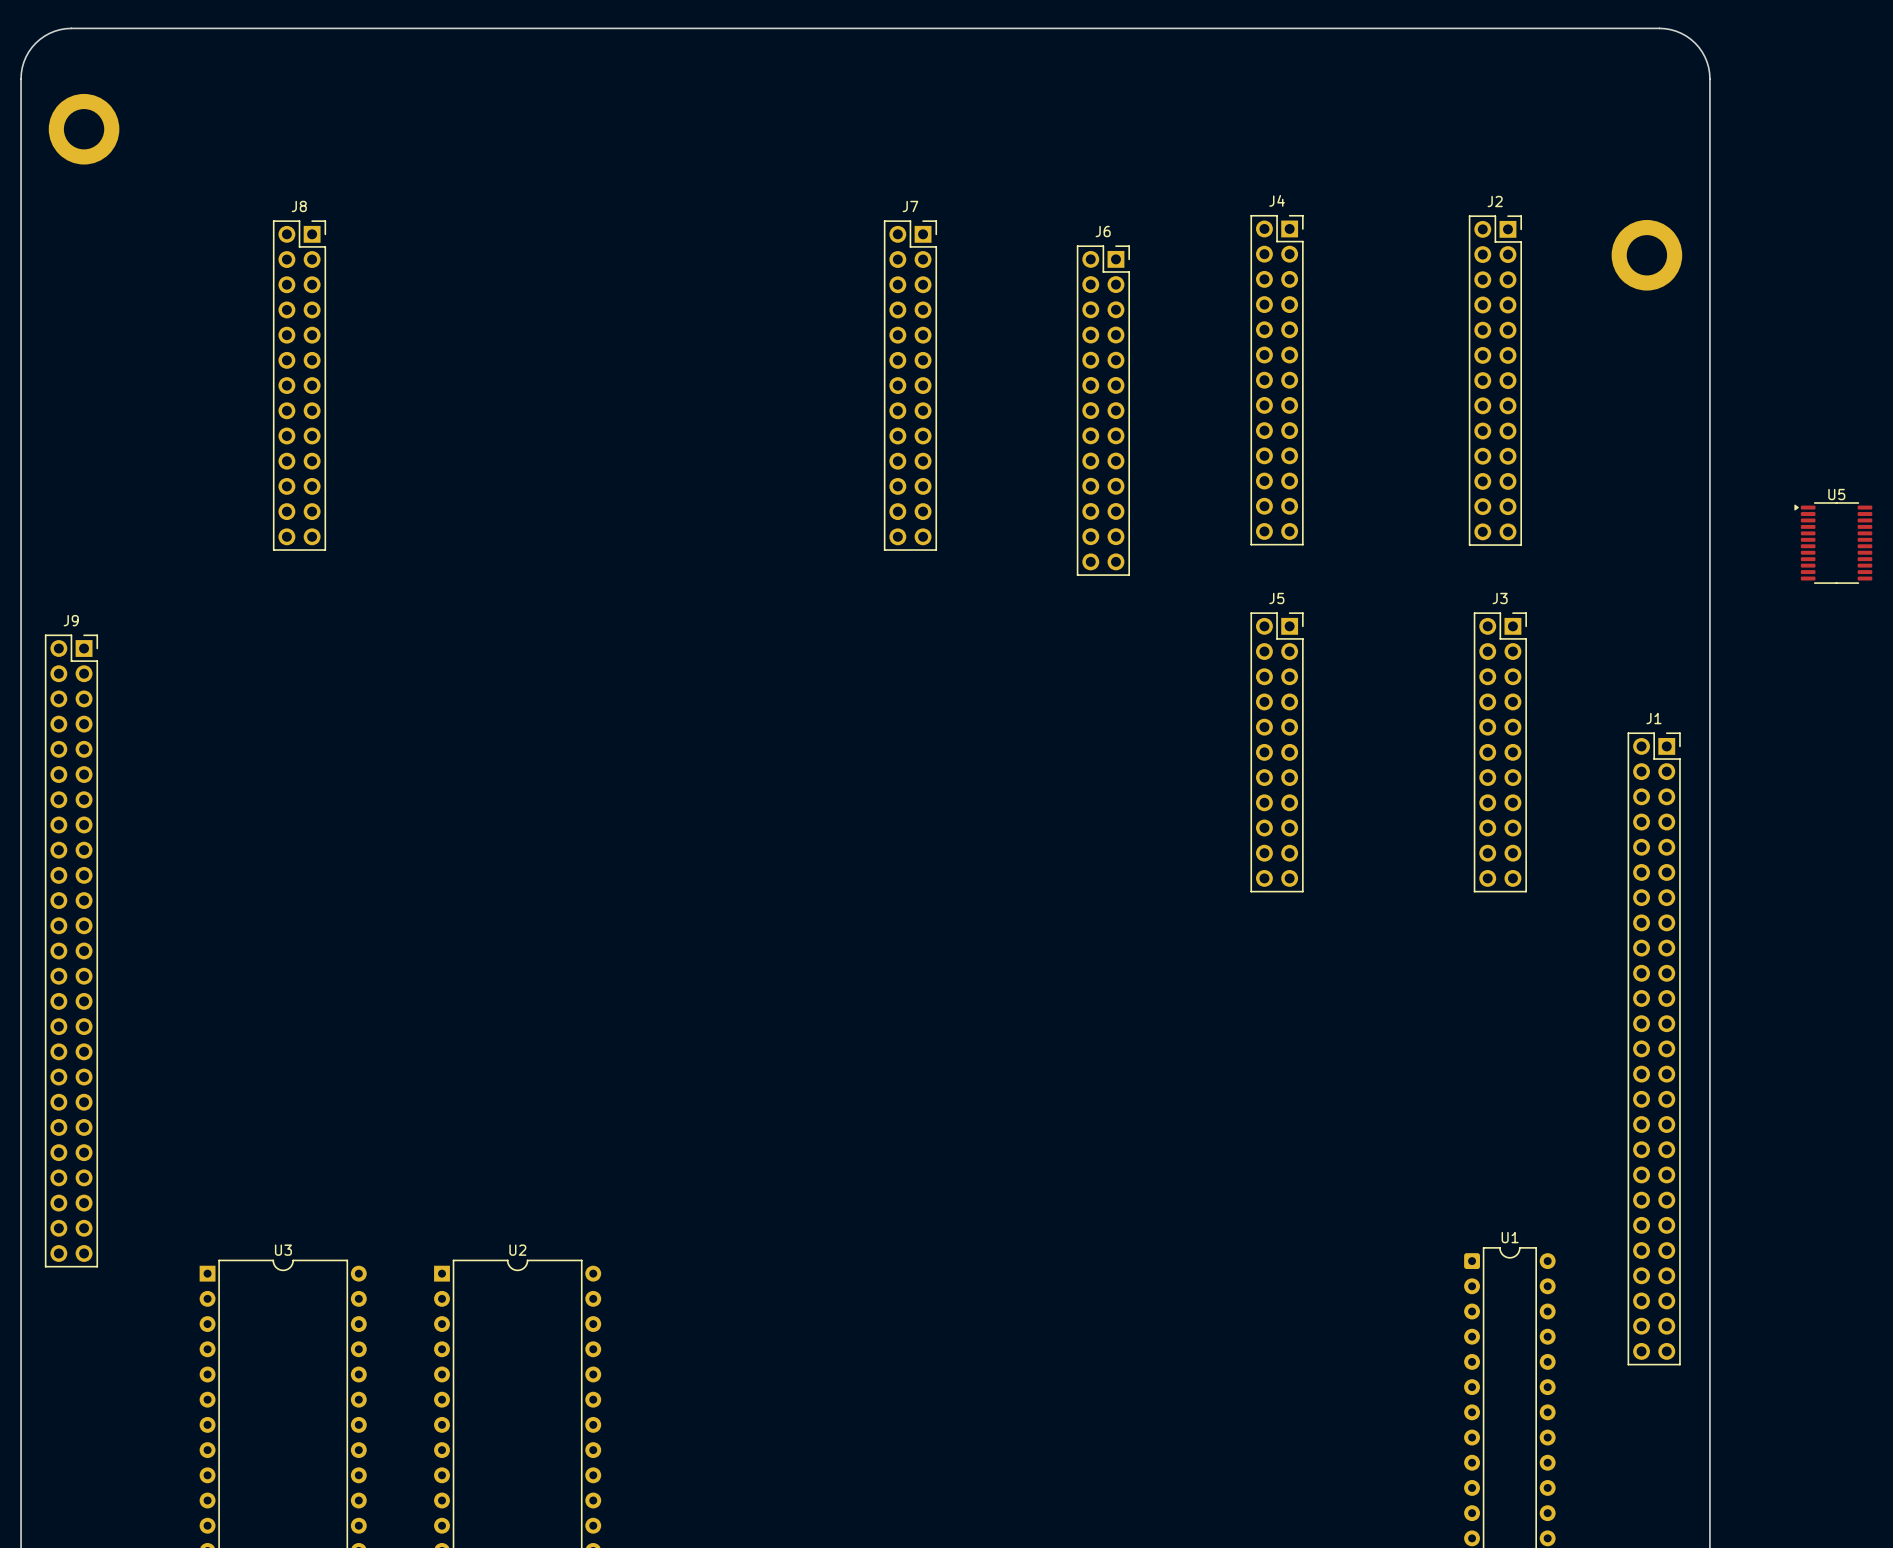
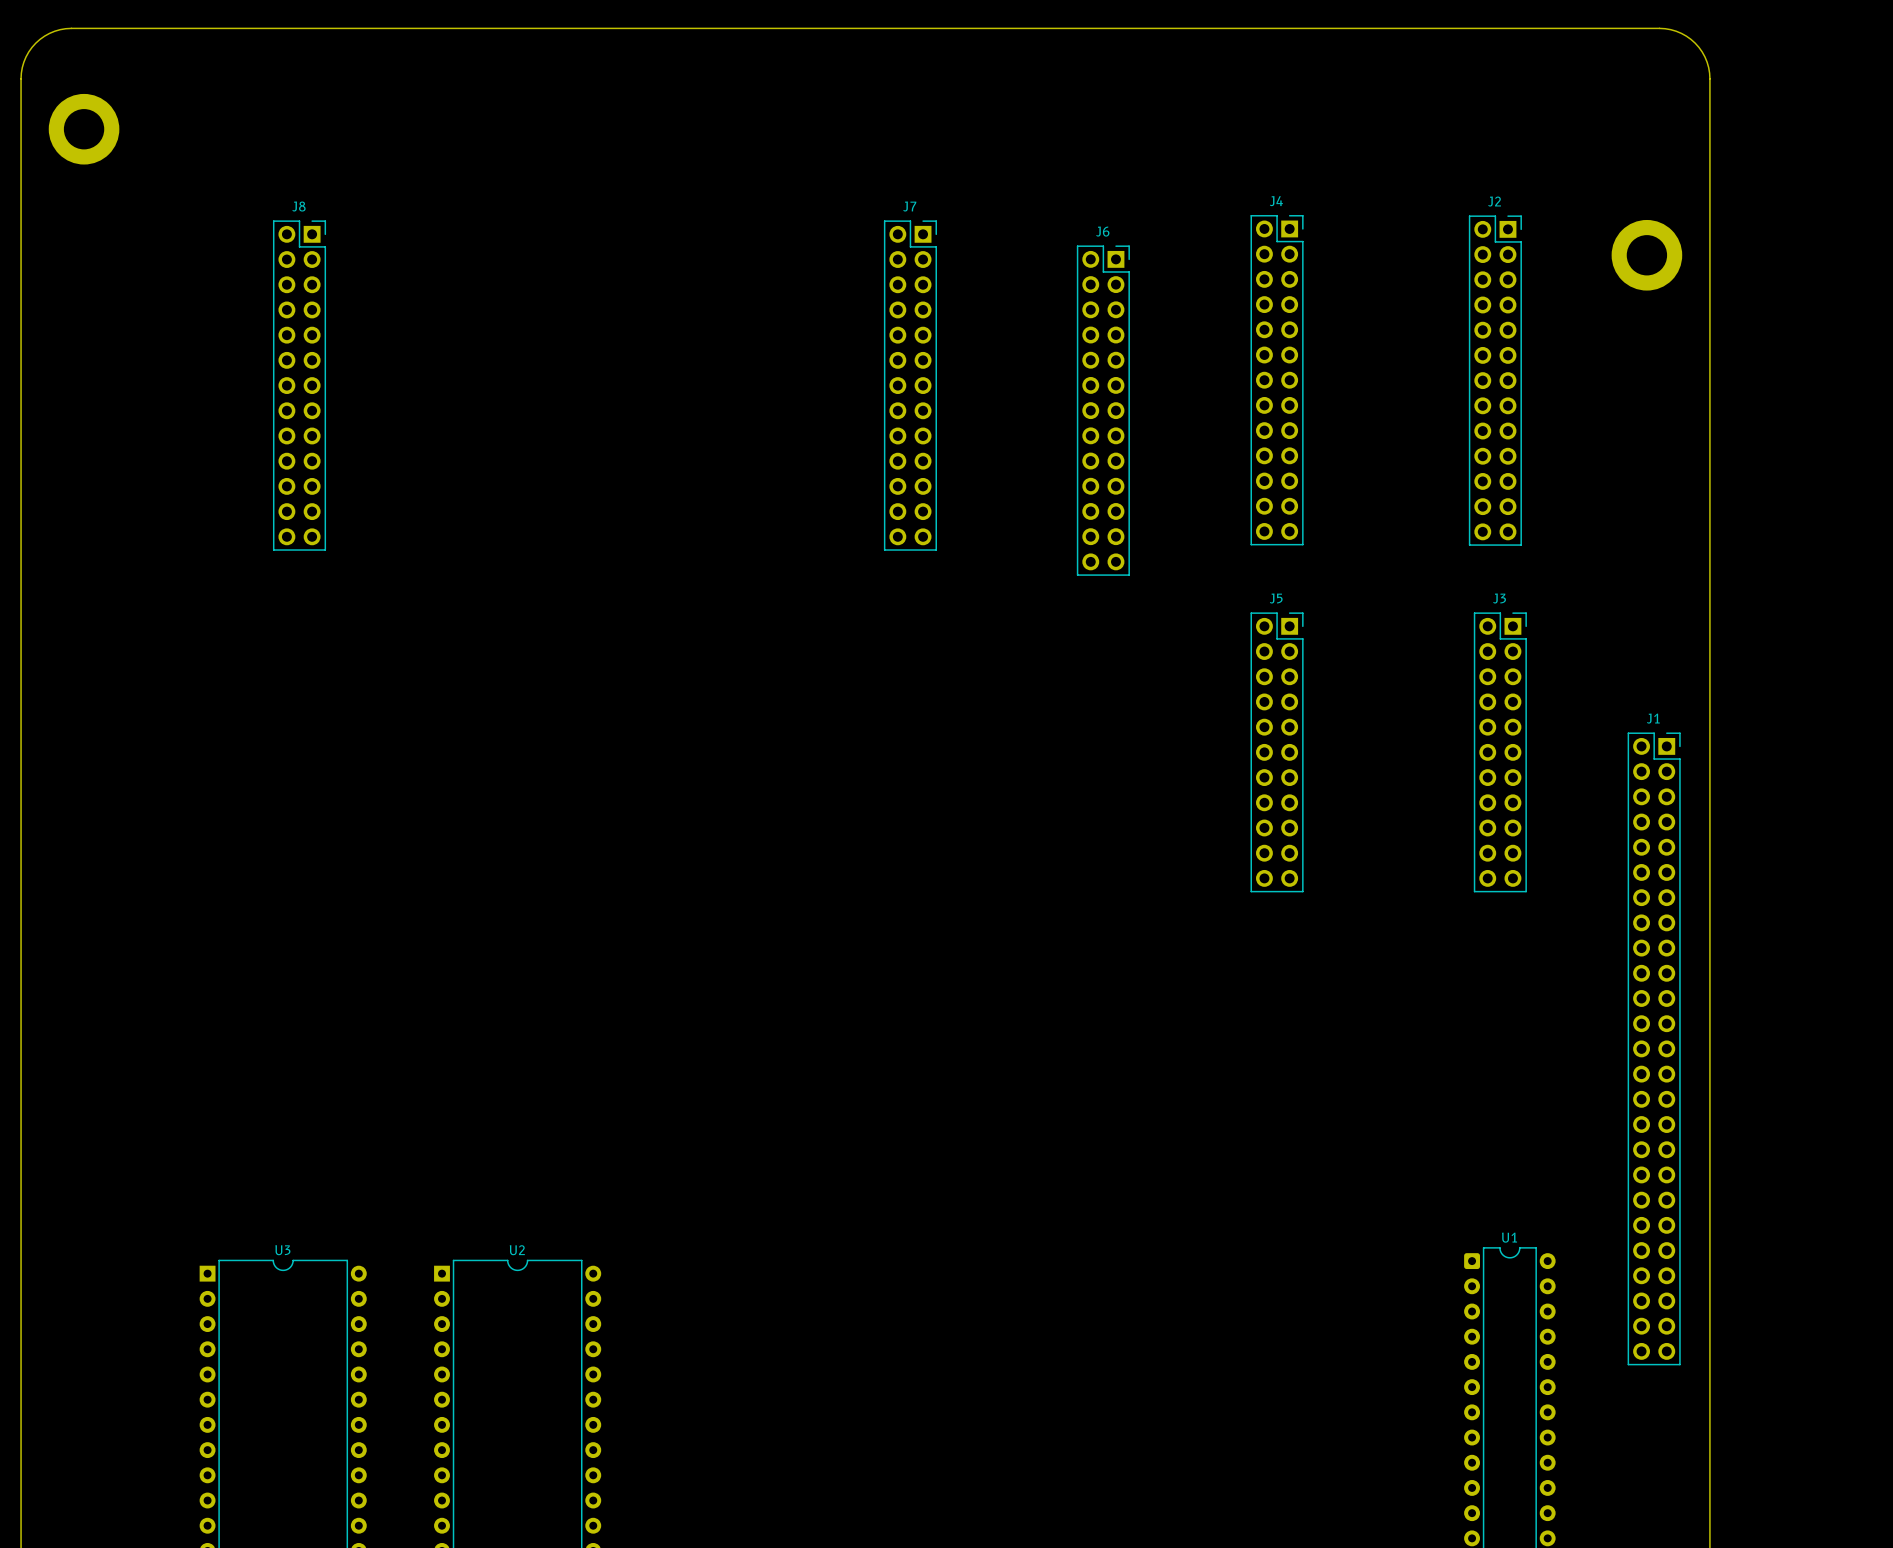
U5: (1833, 543) -> none
J9: (71, 950) -> none

